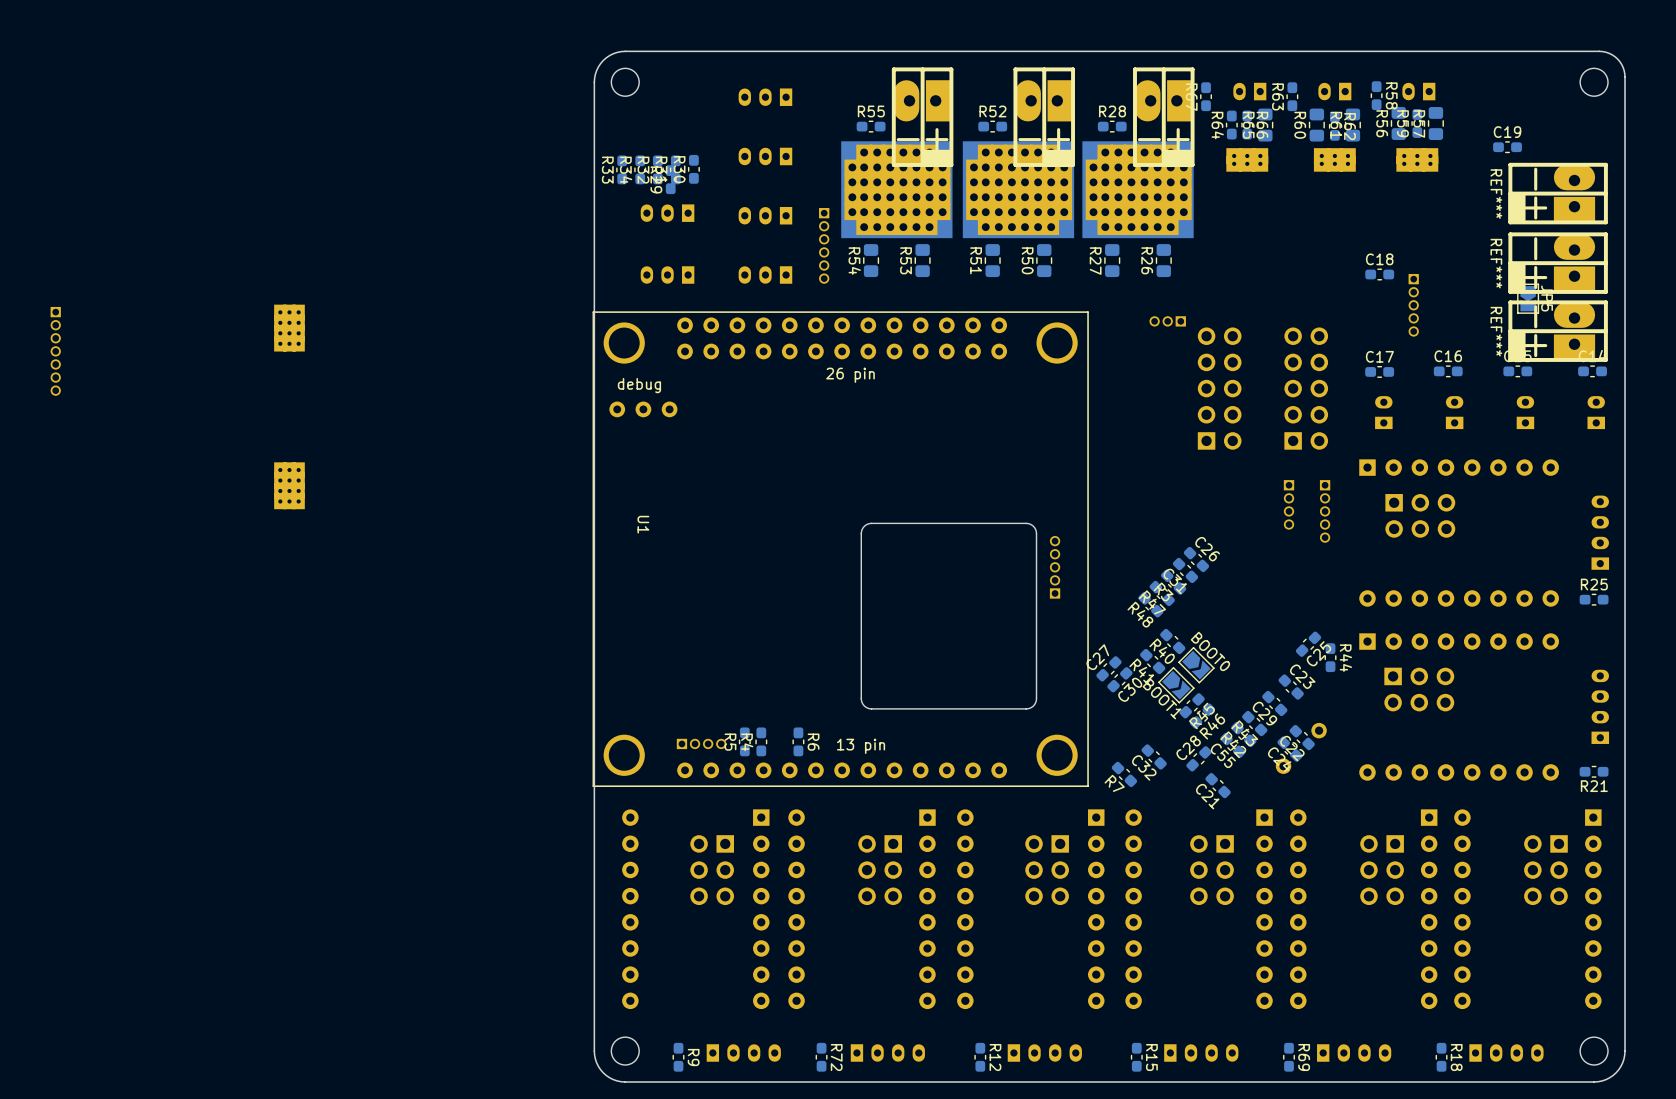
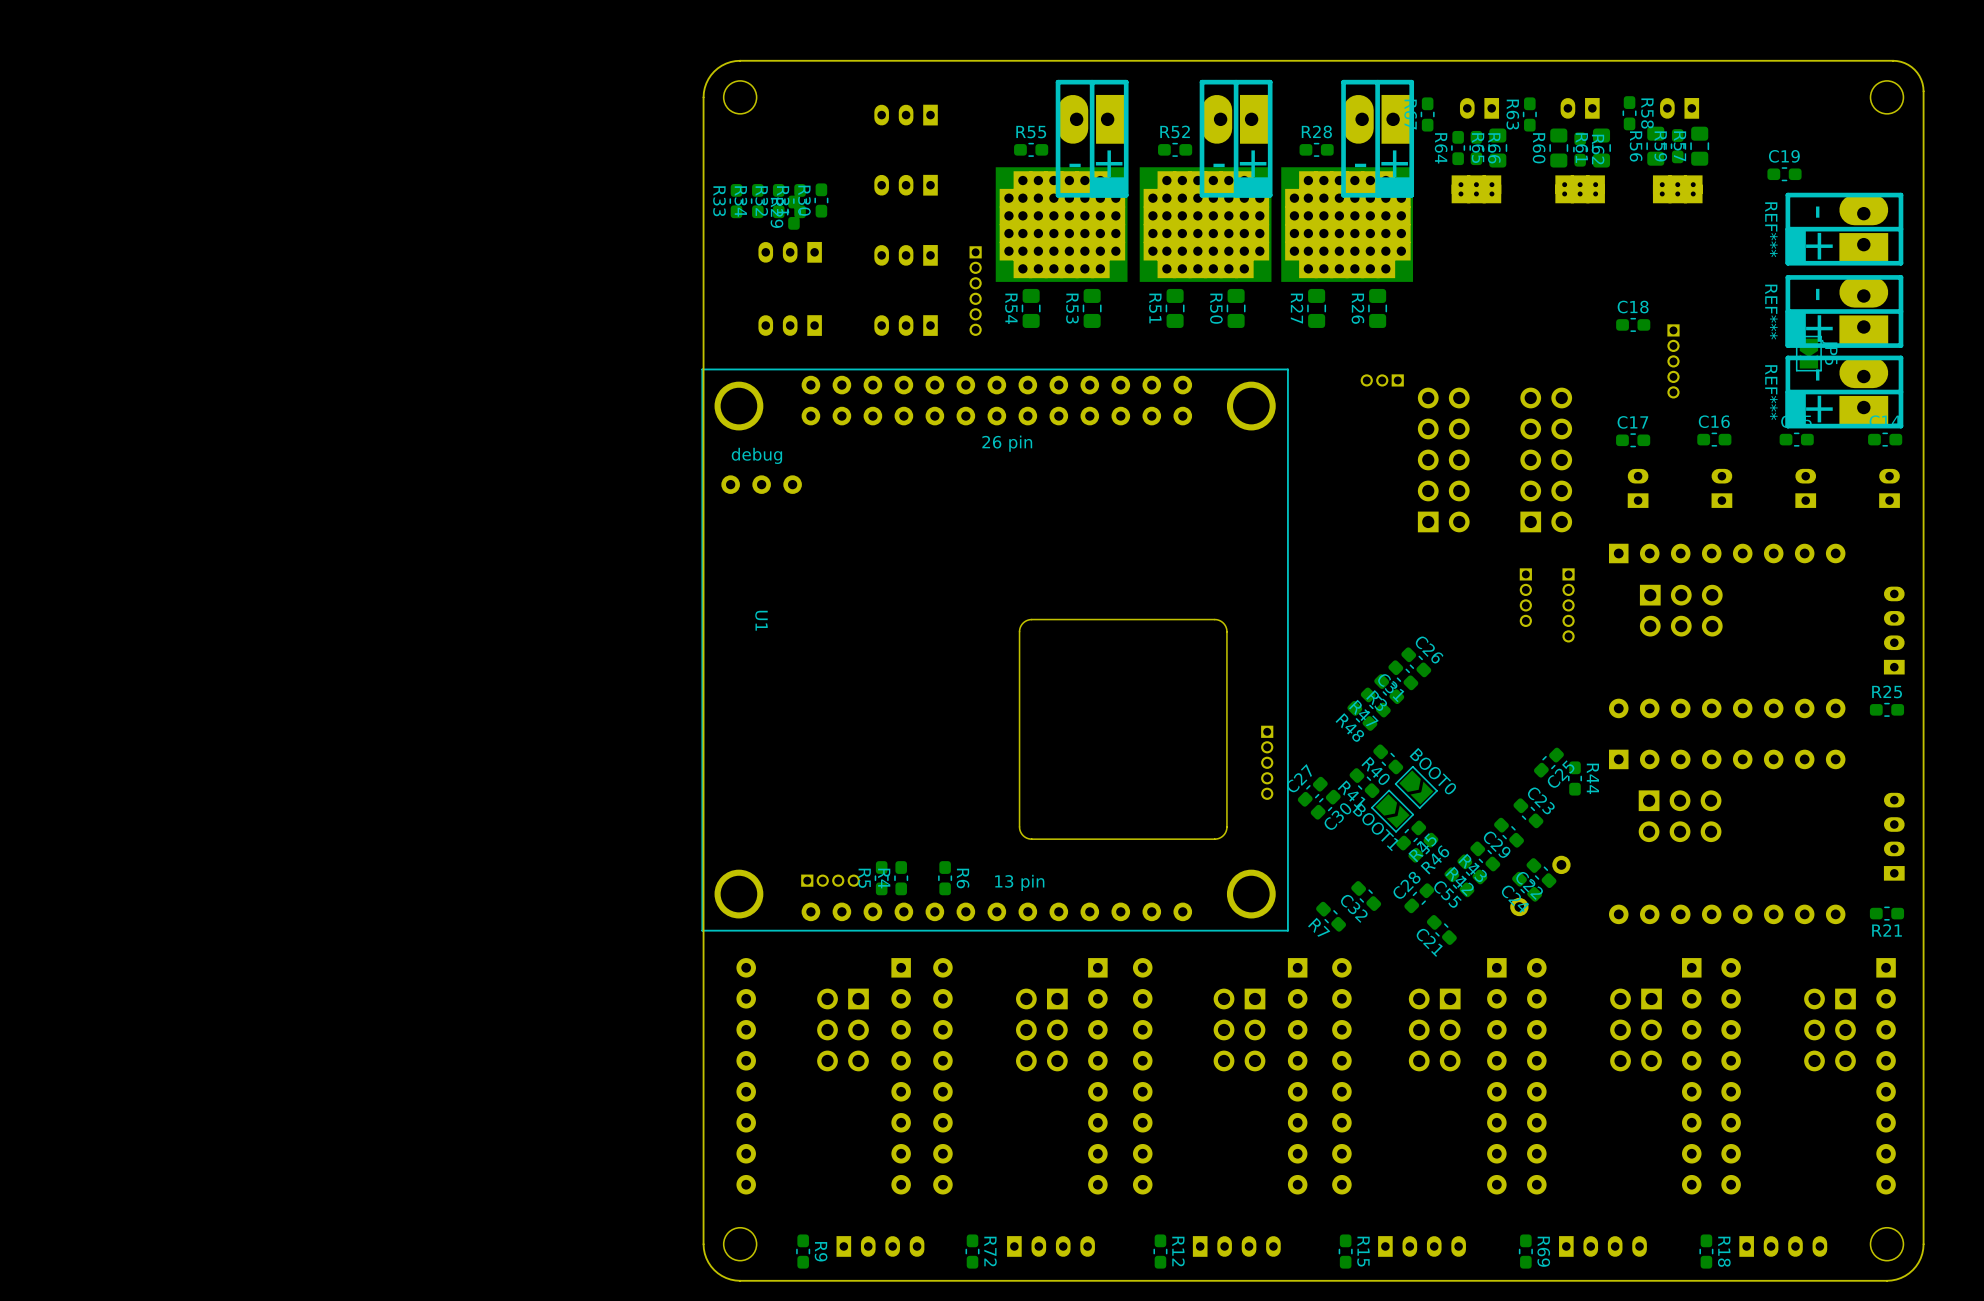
part: (289, 328) -> none
part: (55, 351) -> none
part: (289, 485) -> none
part rotation: 0° (1055, 567) -> 180° (1267, 762)
part position: (1055, 567) -> (1267, 762)

